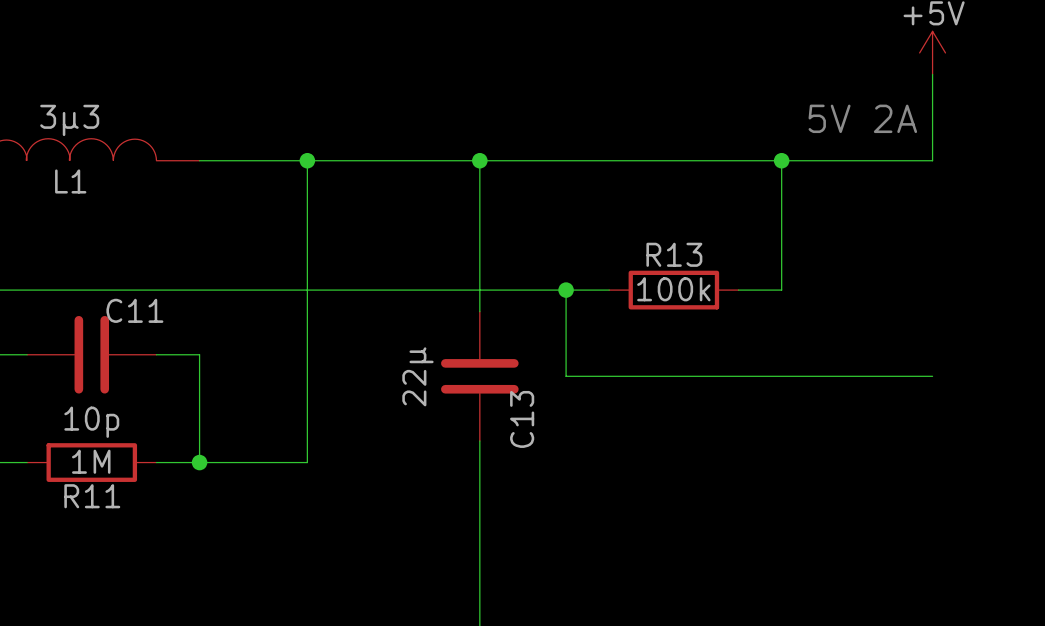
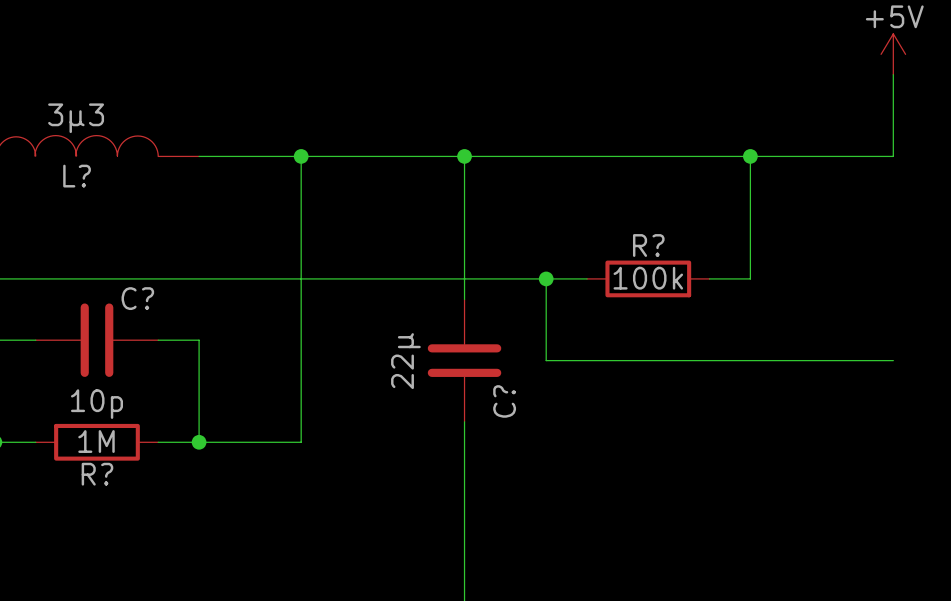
text: 5V 2A (862, 118) -> none
L1 name: L1 (70, 181) -> L? (77, 176)
R13 name: R13 (674, 254) -> R? (648, 245)
C11 name: C11 (134, 310) -> C? (137, 298)
C13 name: C13 (522, 419) -> C? (504, 401)
R11 name: R11 (92, 496) -> R? (97, 474)

